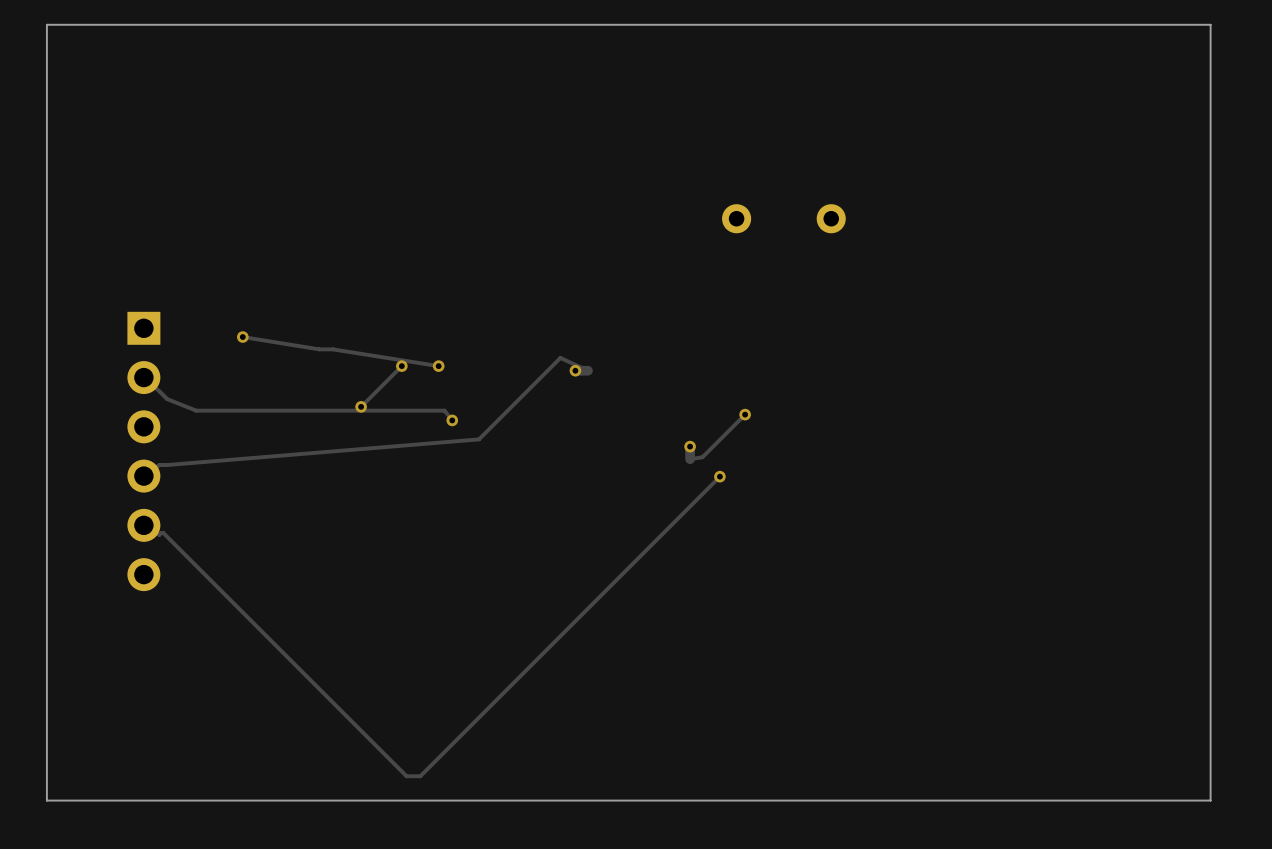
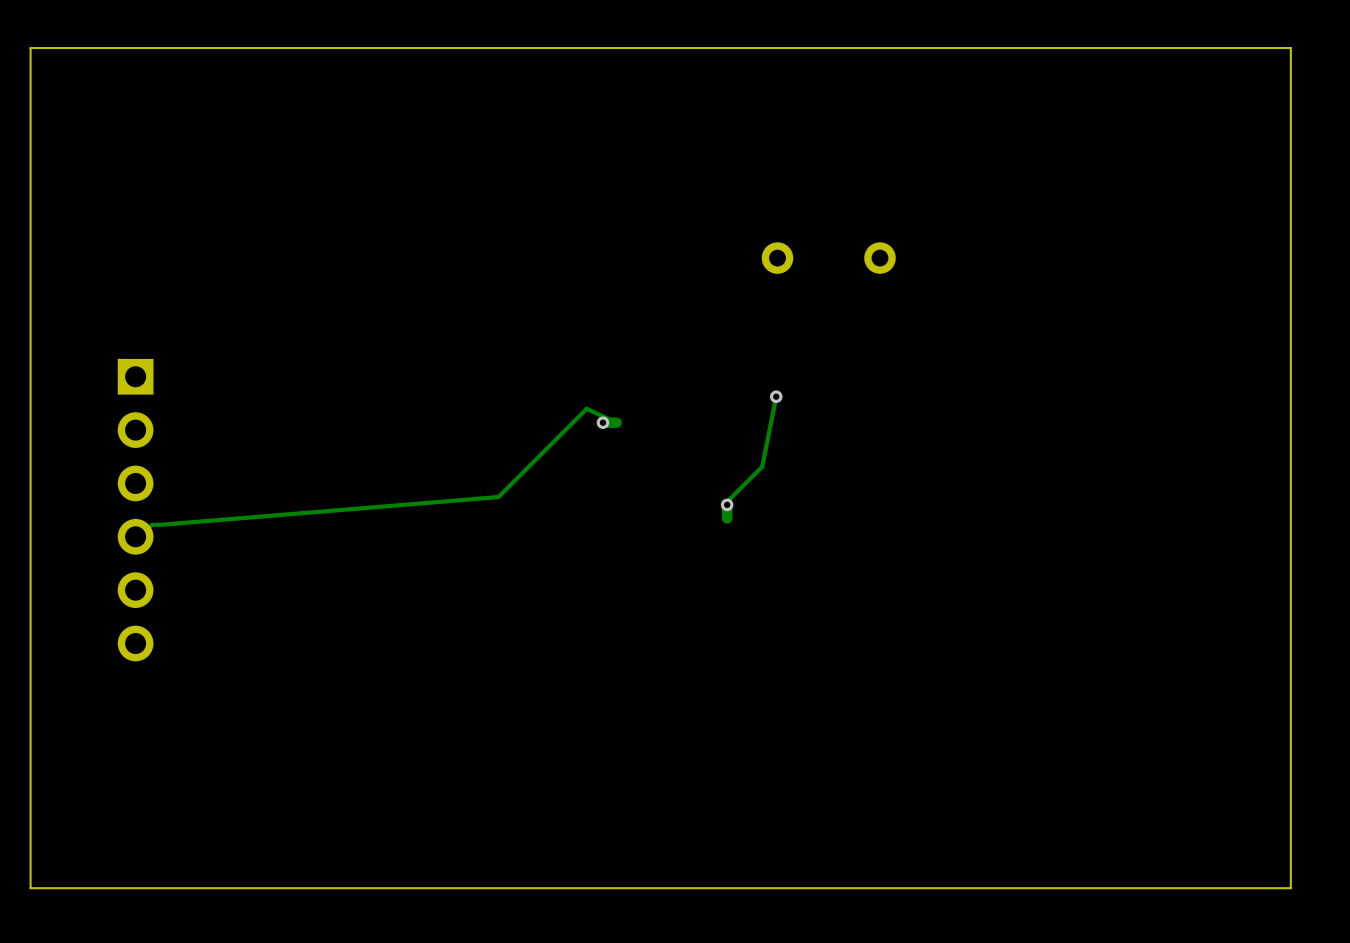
track: (242, 337) (438, 366) -> none
via: (242, 337) -> none
via: none -> (776, 396)
track: (401, 366) (361, 406) -> none
via: (401, 366) -> none
via: (438, 366) -> none
track: (143, 377) (167, 399) (196, 410) (444, 410) (452, 420) -> none
via: (361, 406) -> none
track: (745, 414) (702, 457) (690, 459) -> (776, 396) (762, 466) (726, 502) (727, 518)
via: (745, 414) -> none
via: (452, 420) -> none
track: (719, 476) (420, 776) (406, 776) (163, 532) (159, 534) (143, 525) -> none
via: (719, 476) -> none

